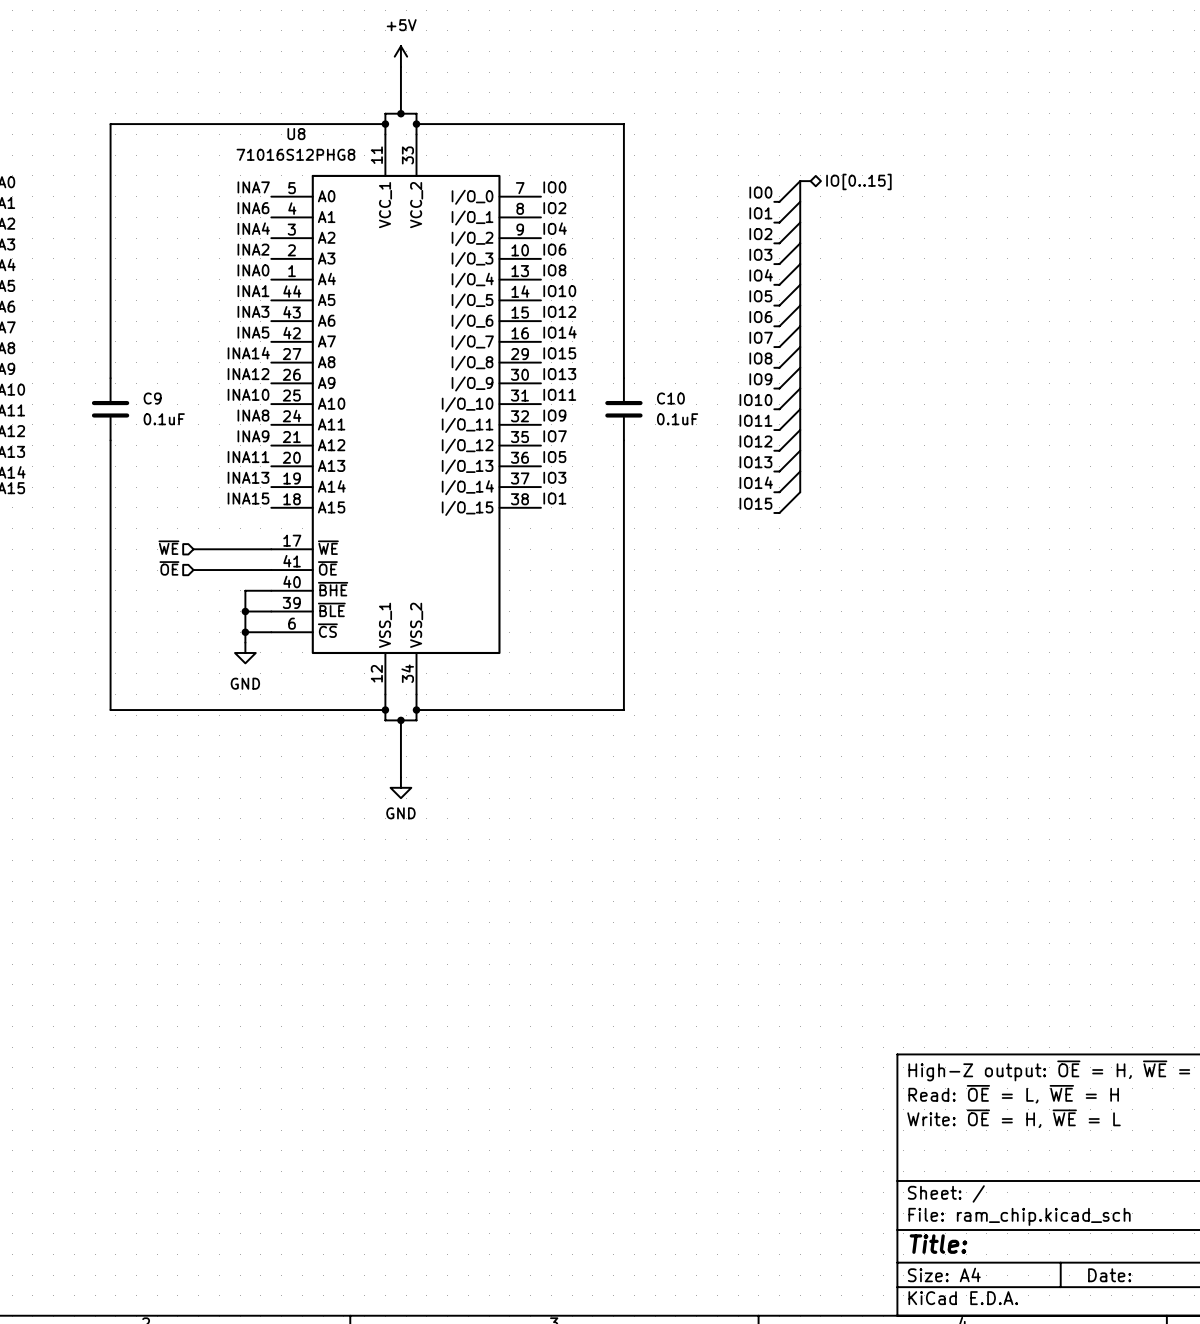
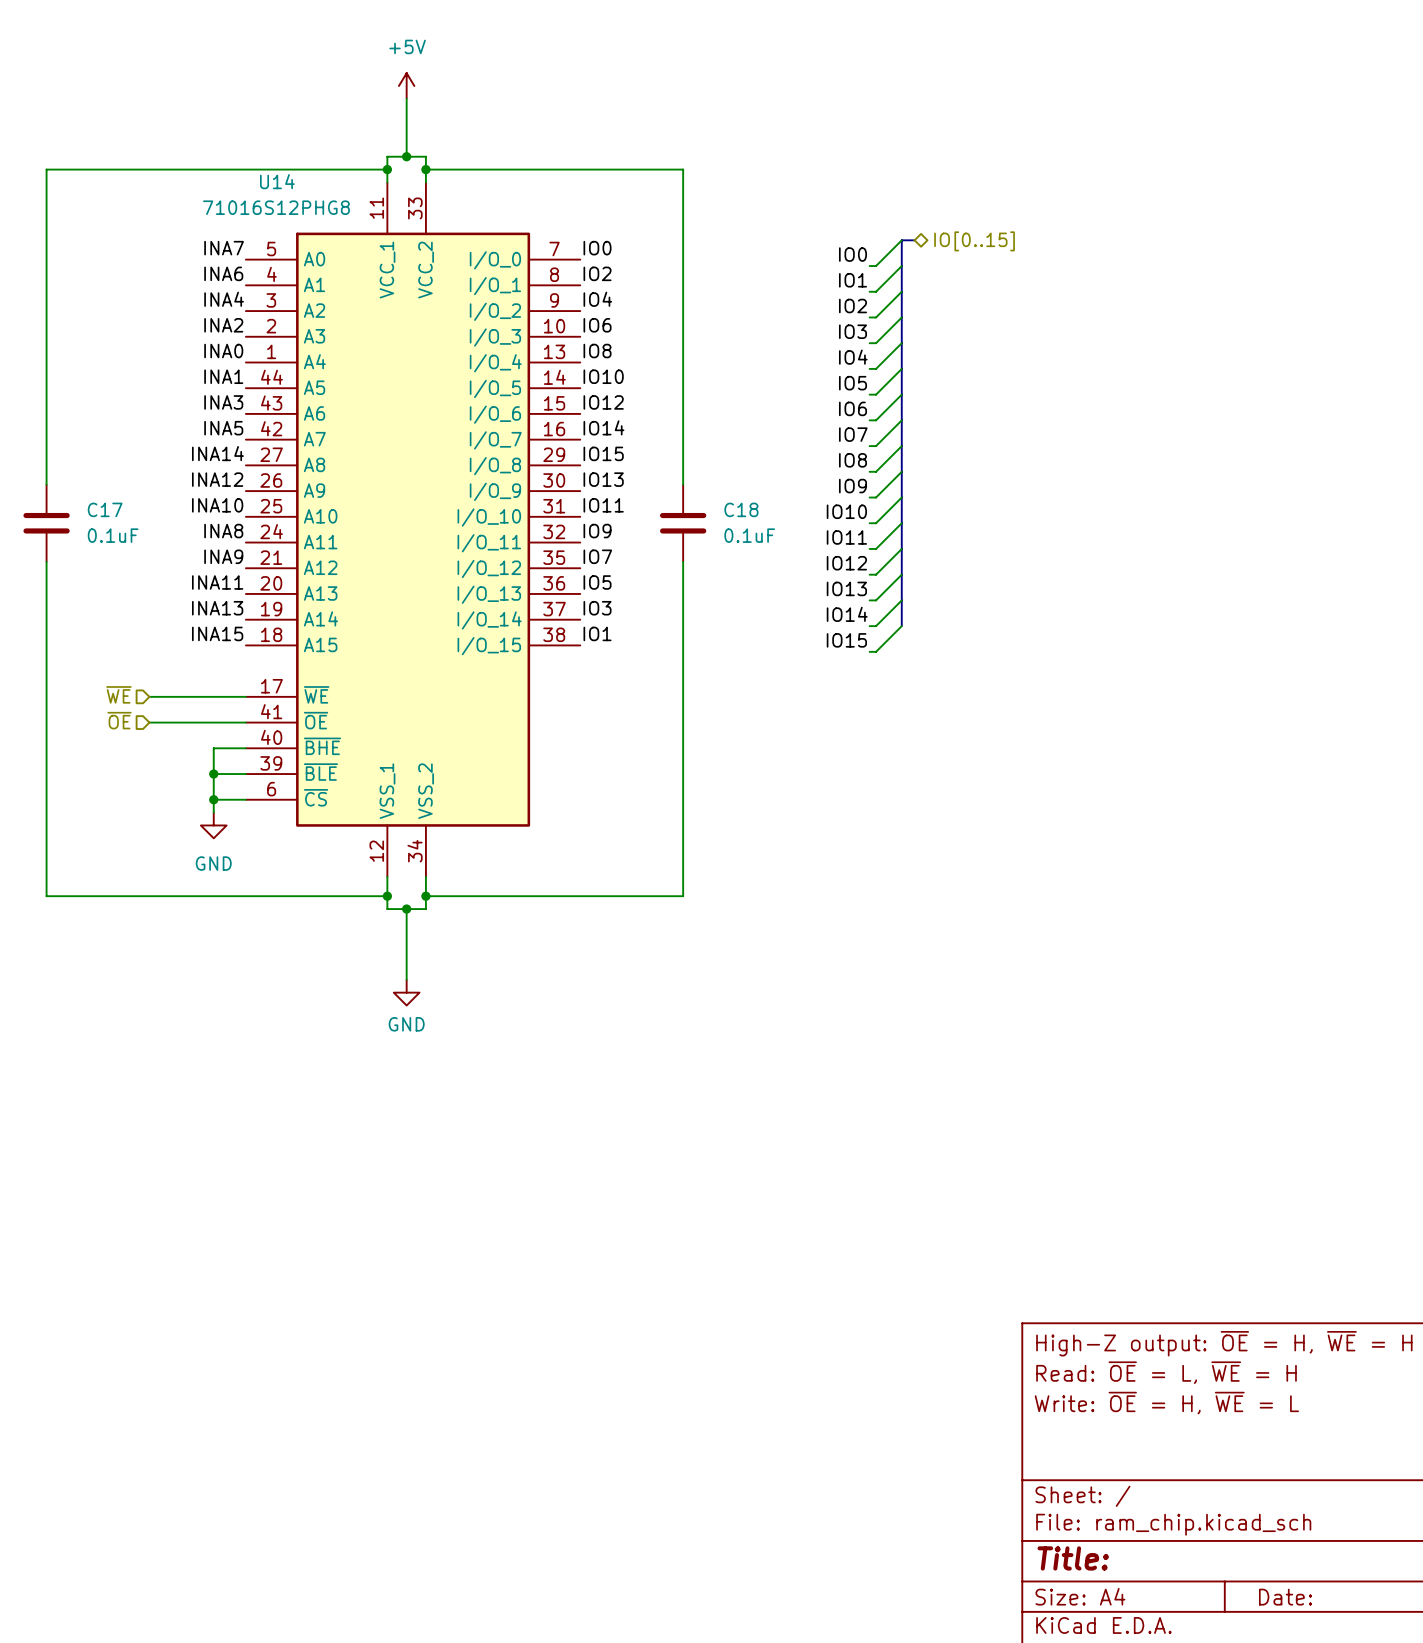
U8 name: U8 (296, 134) -> U14 (277, 181)
C9 name: C9 (152, 398) -> C17 (105, 509)
C10 name: C10 (670, 398) -> C18 (741, 509)

